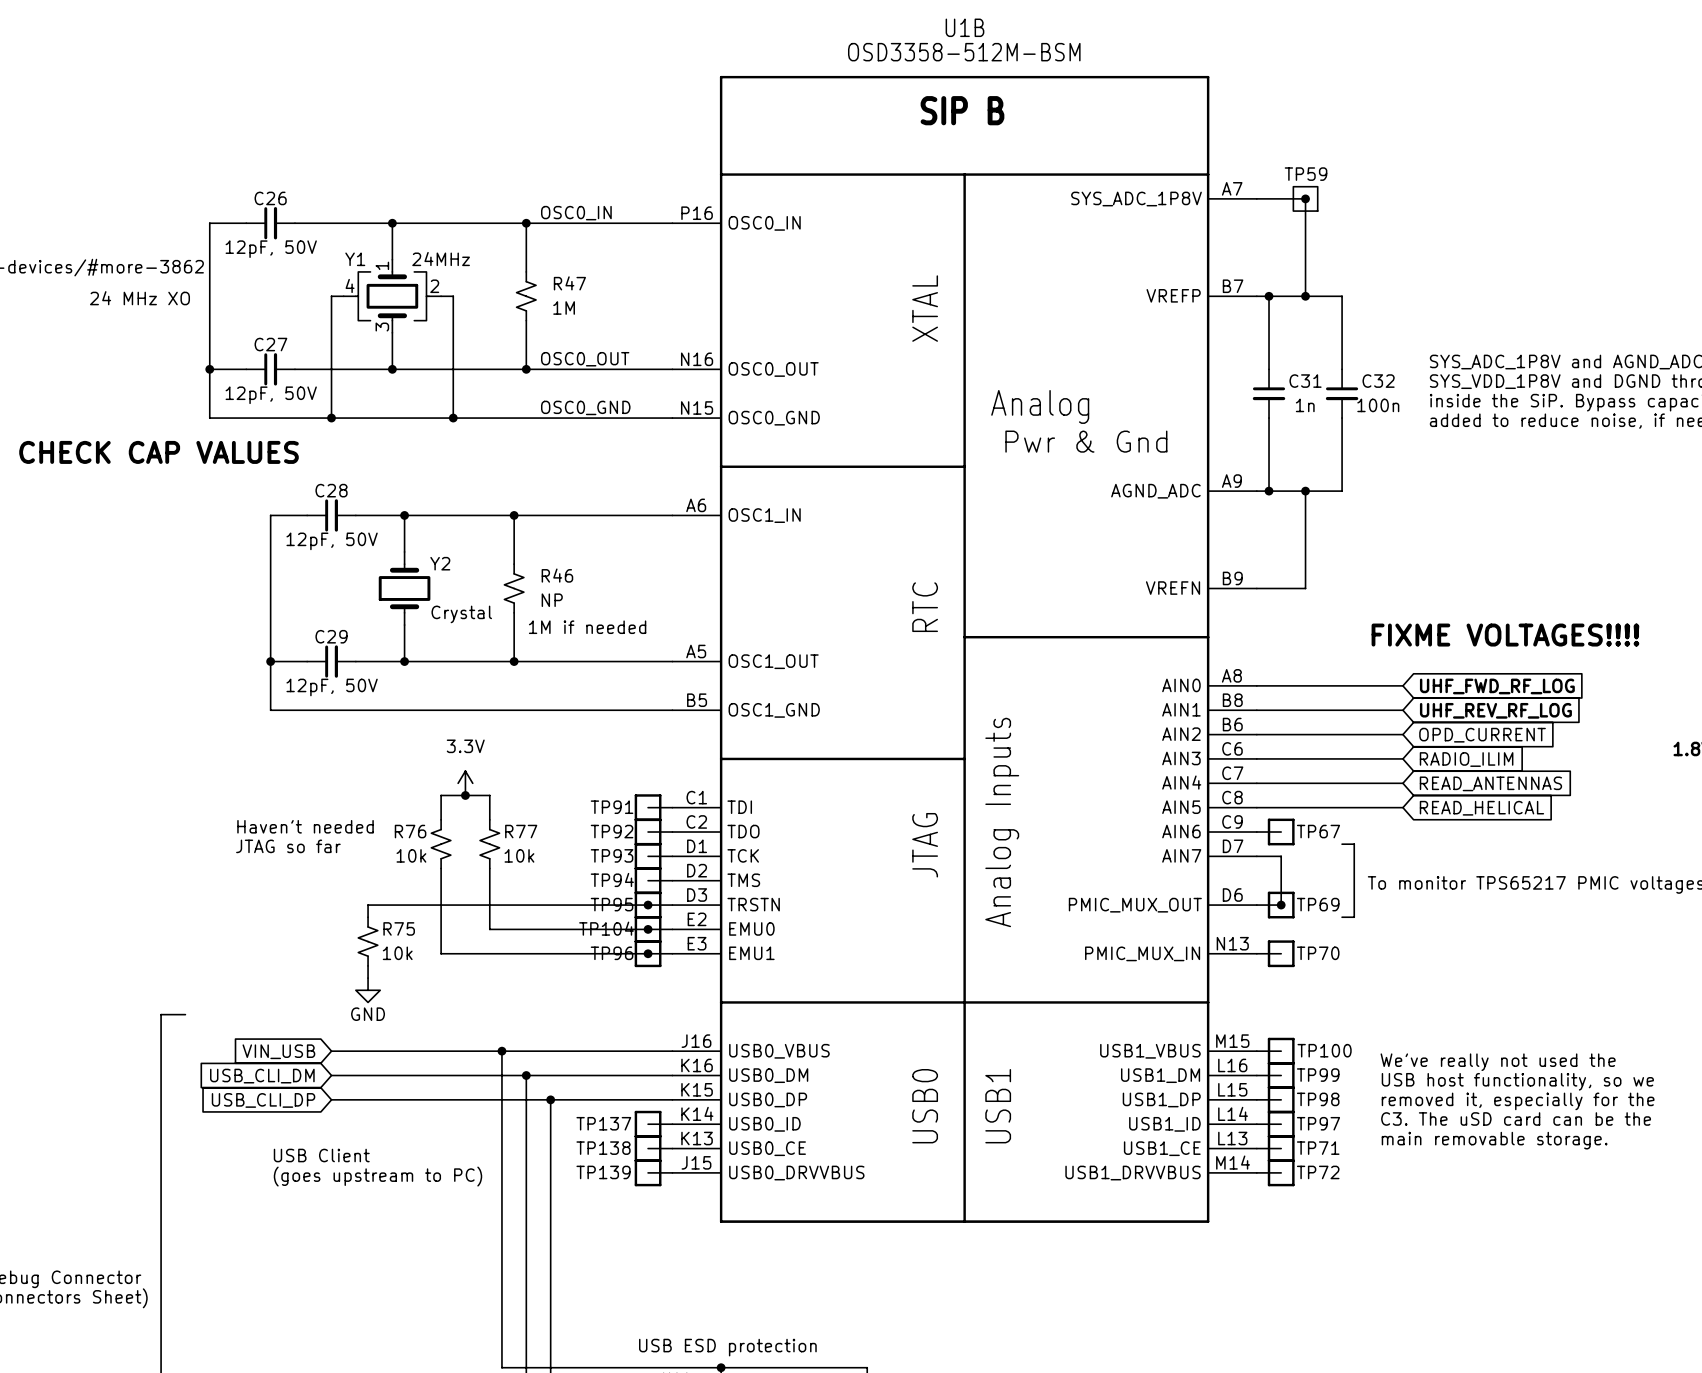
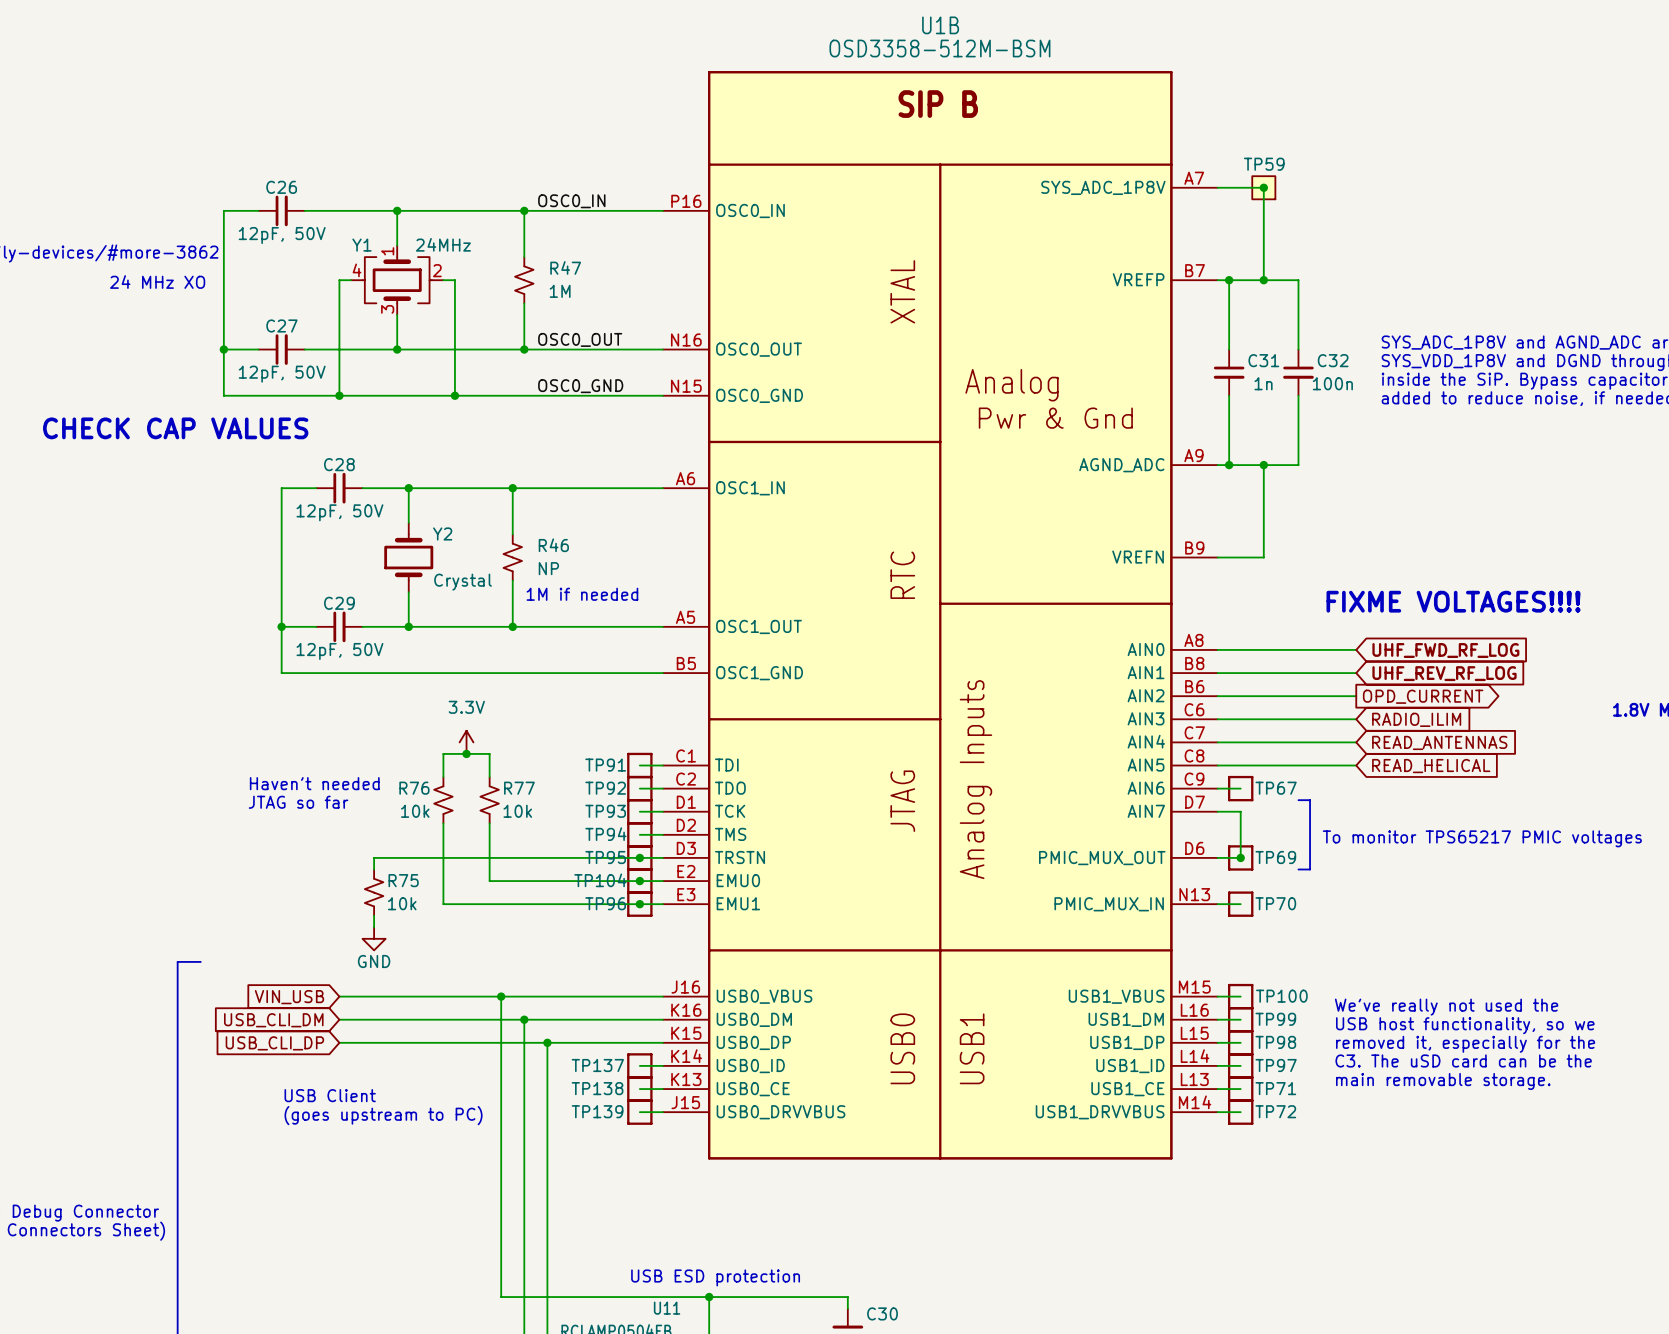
global label shape: input (1482, 735) -> output (1423, 696)

